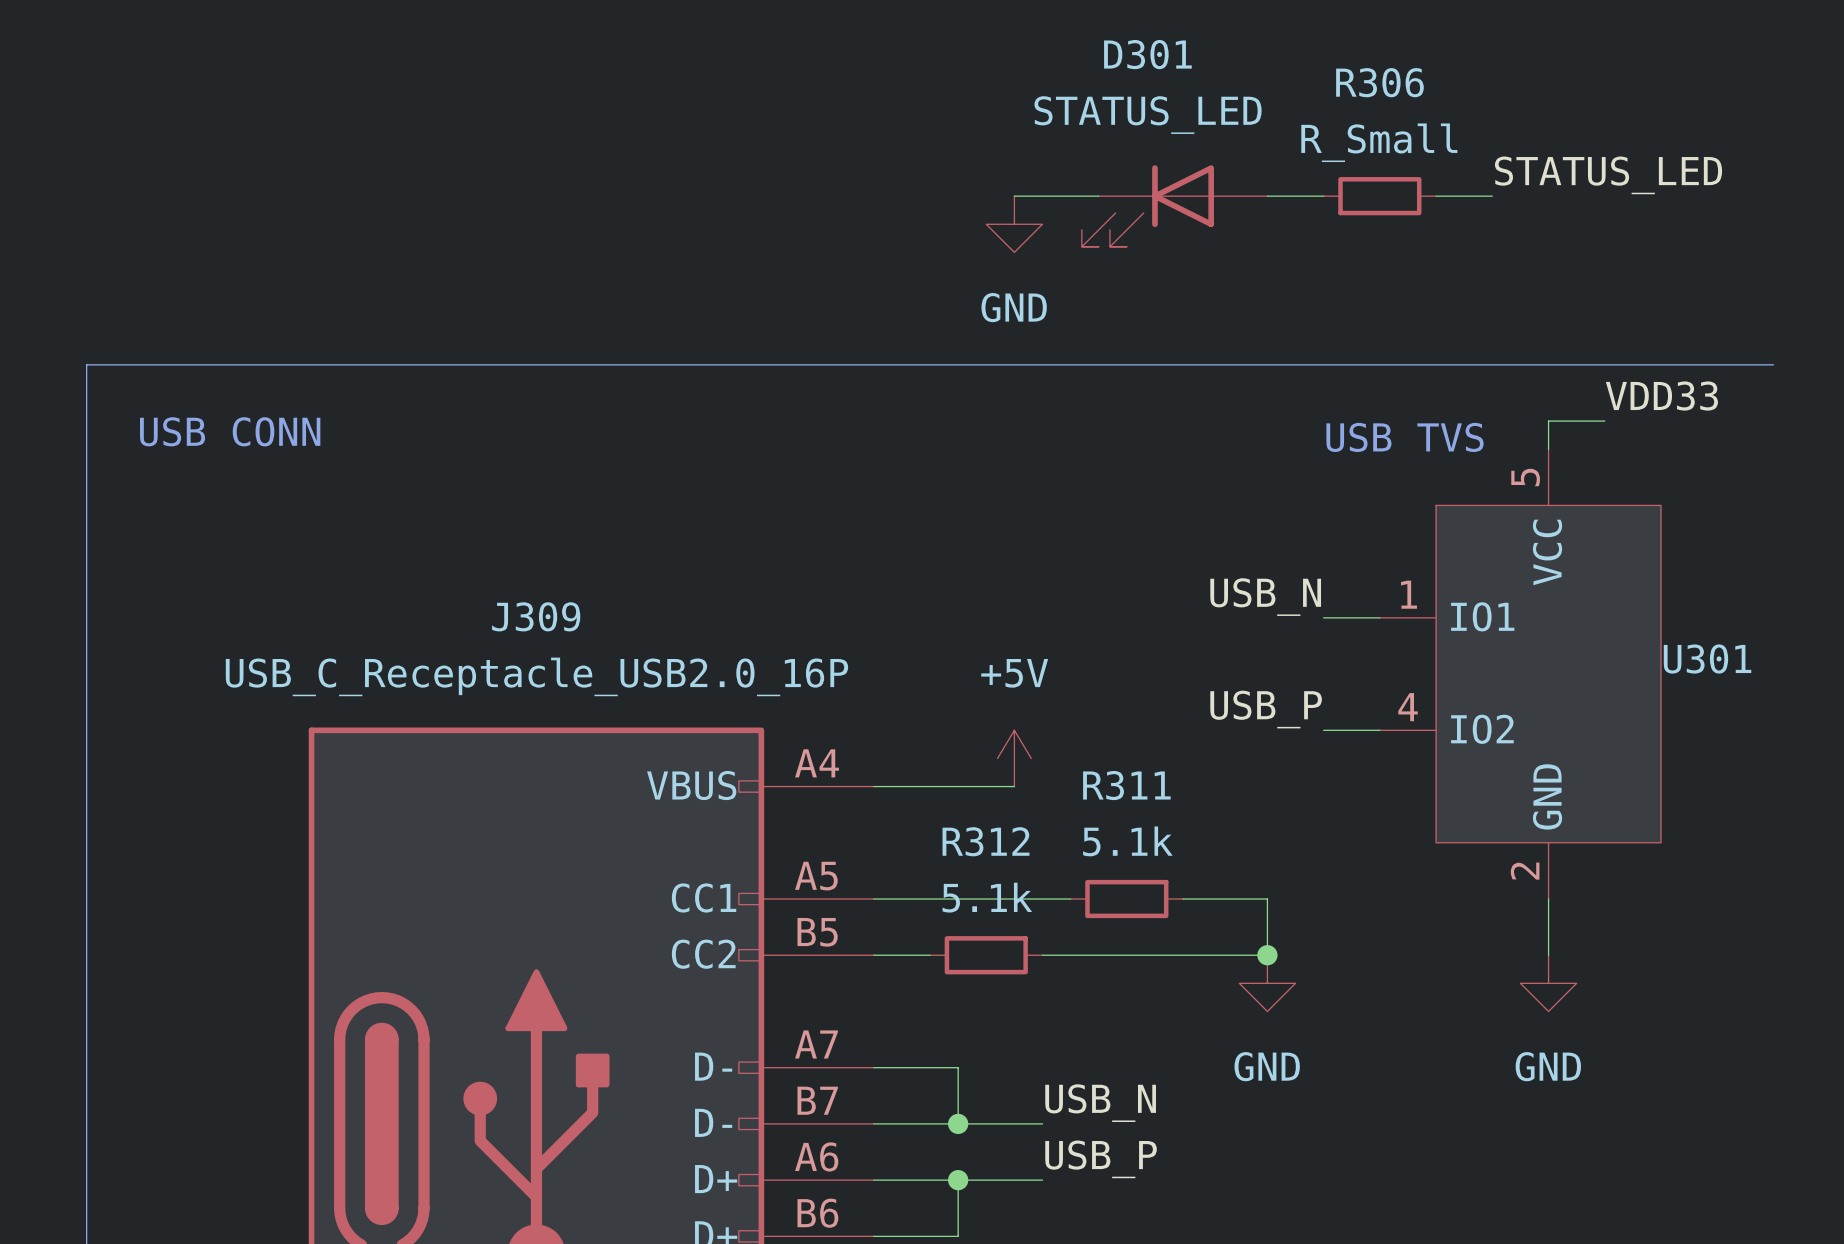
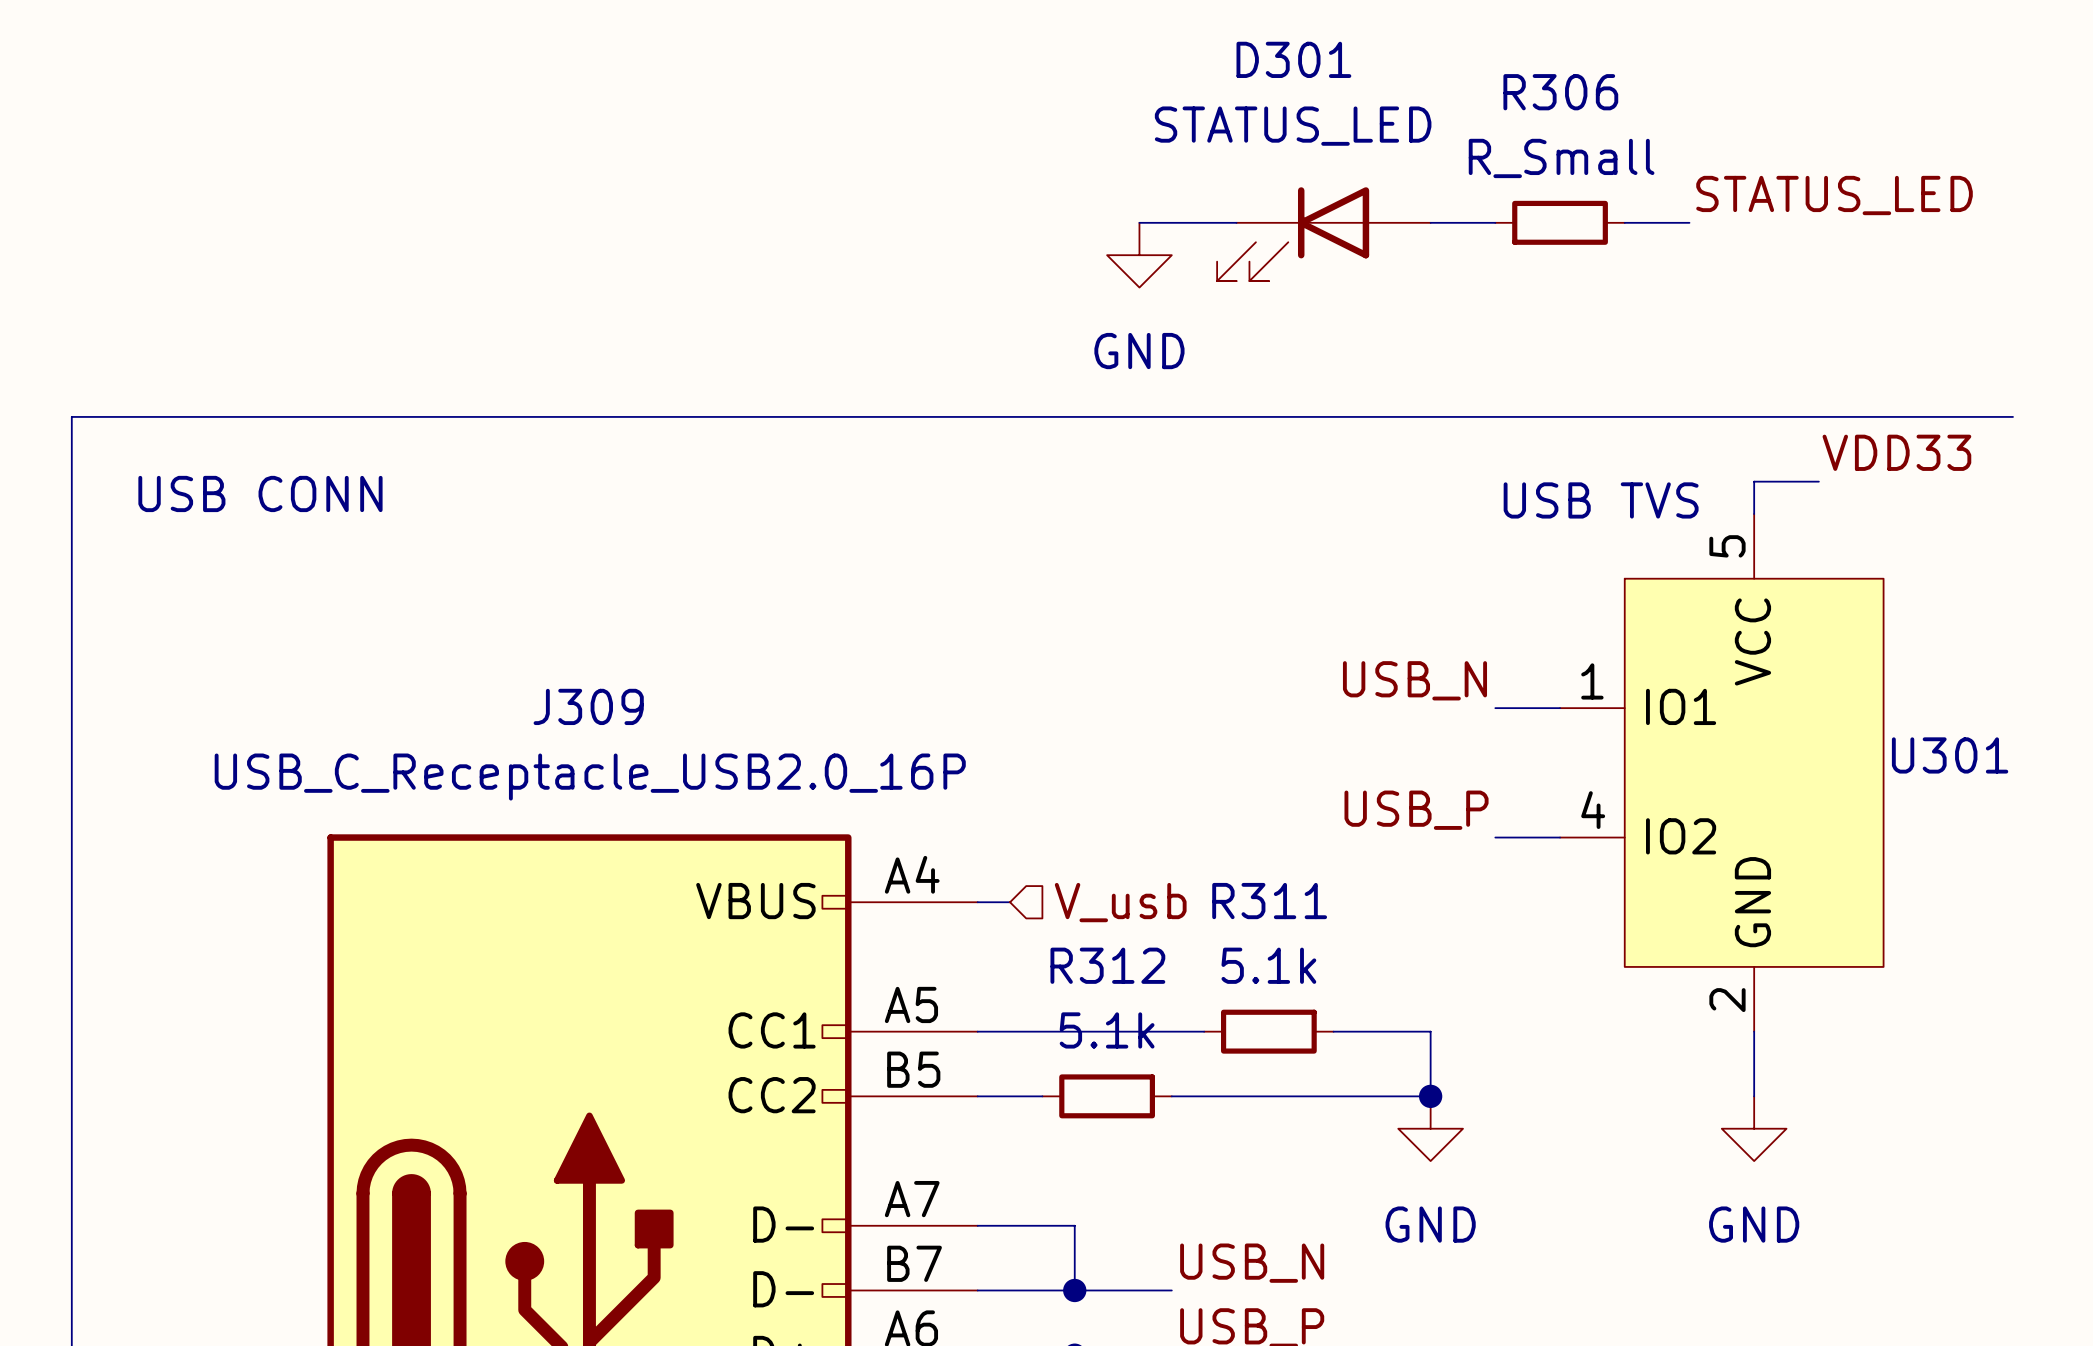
power symbol: +5V (1014, 758) -> none
wire: (901, 786) (1014, 786) -> none
hierarchical label: none -> V_usb (1120, 902)

